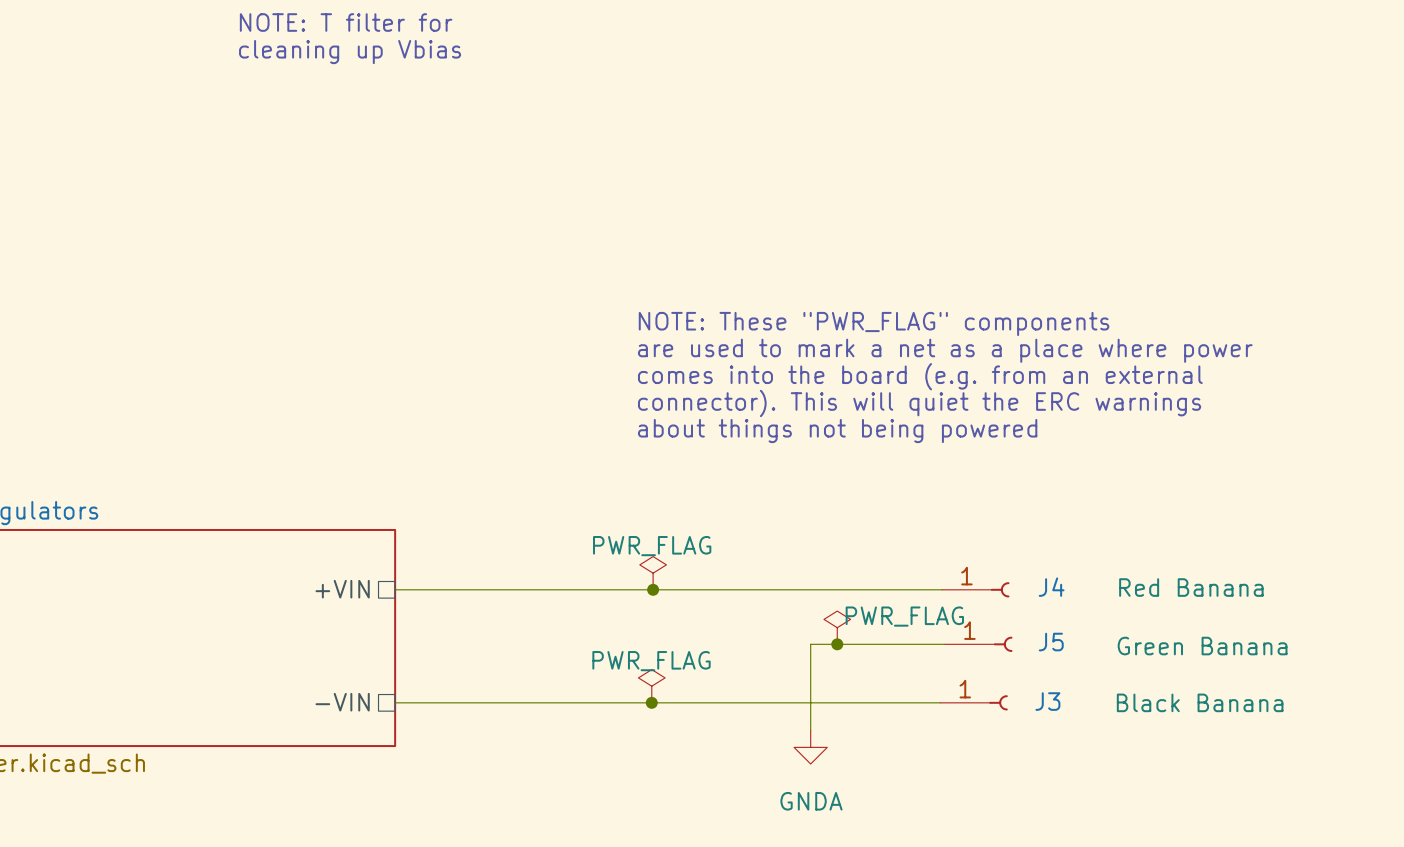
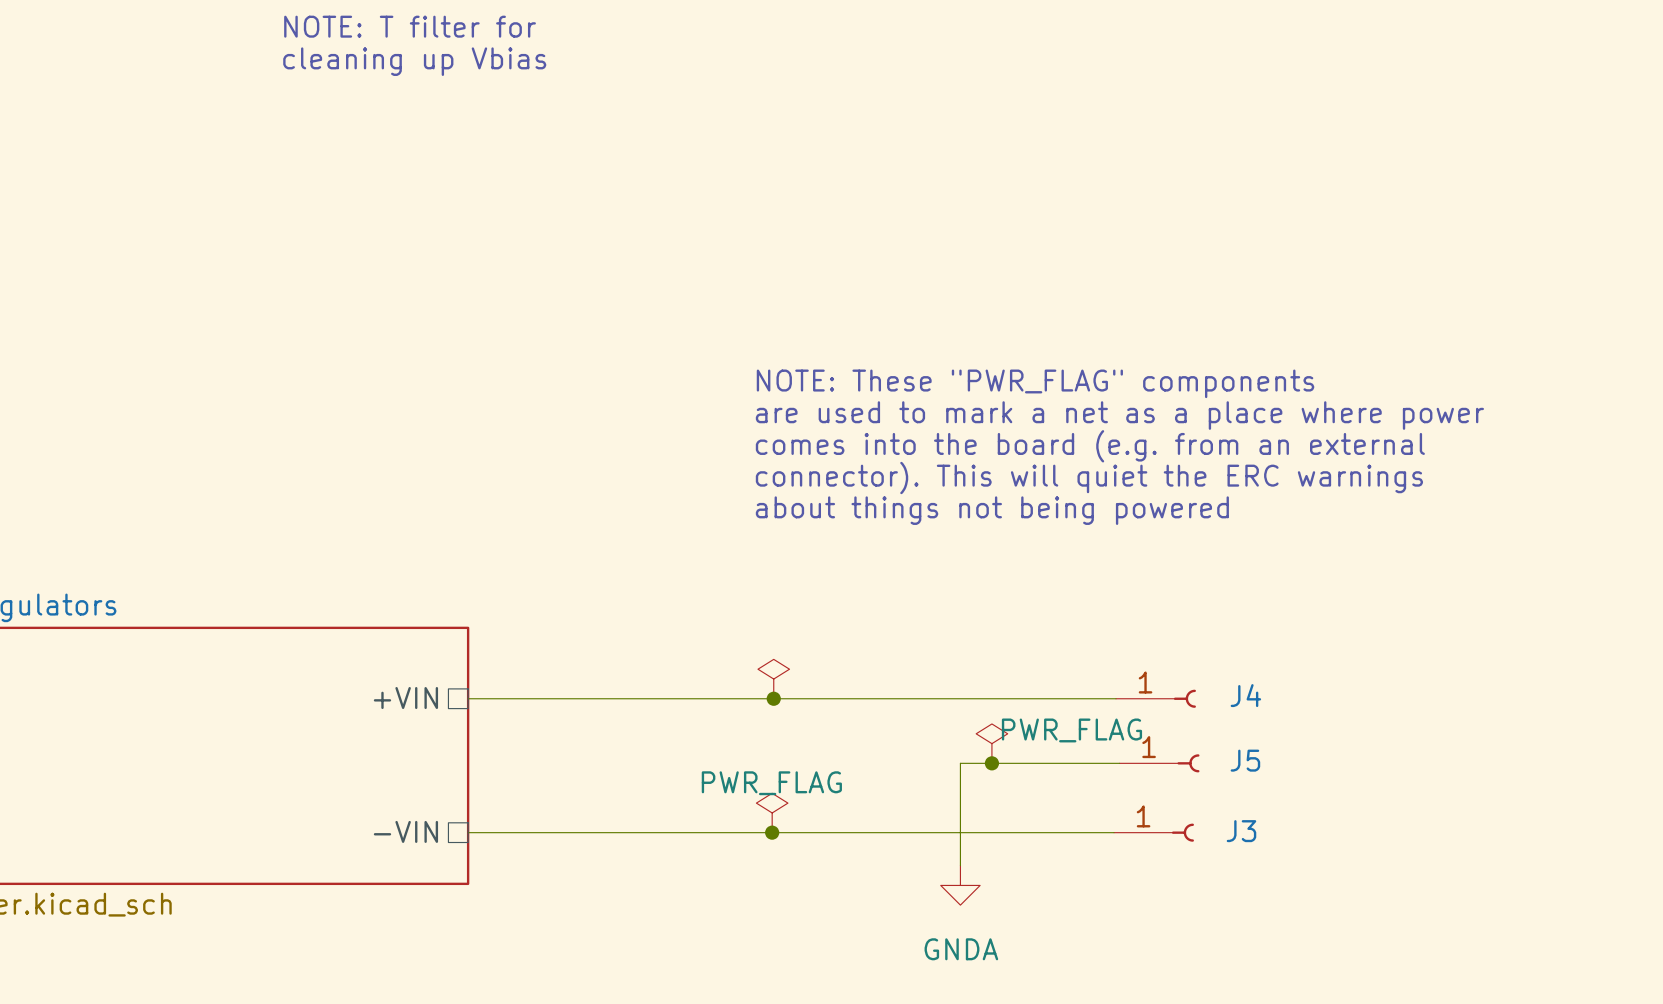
power symbol text: PWR_FLAG (652, 546) -> none
J4 value: Red Banana (1191, 587) -> none
J5 value: Green Banana (1202, 646) -> none
J3 value: Black Banana (1200, 702) -> none

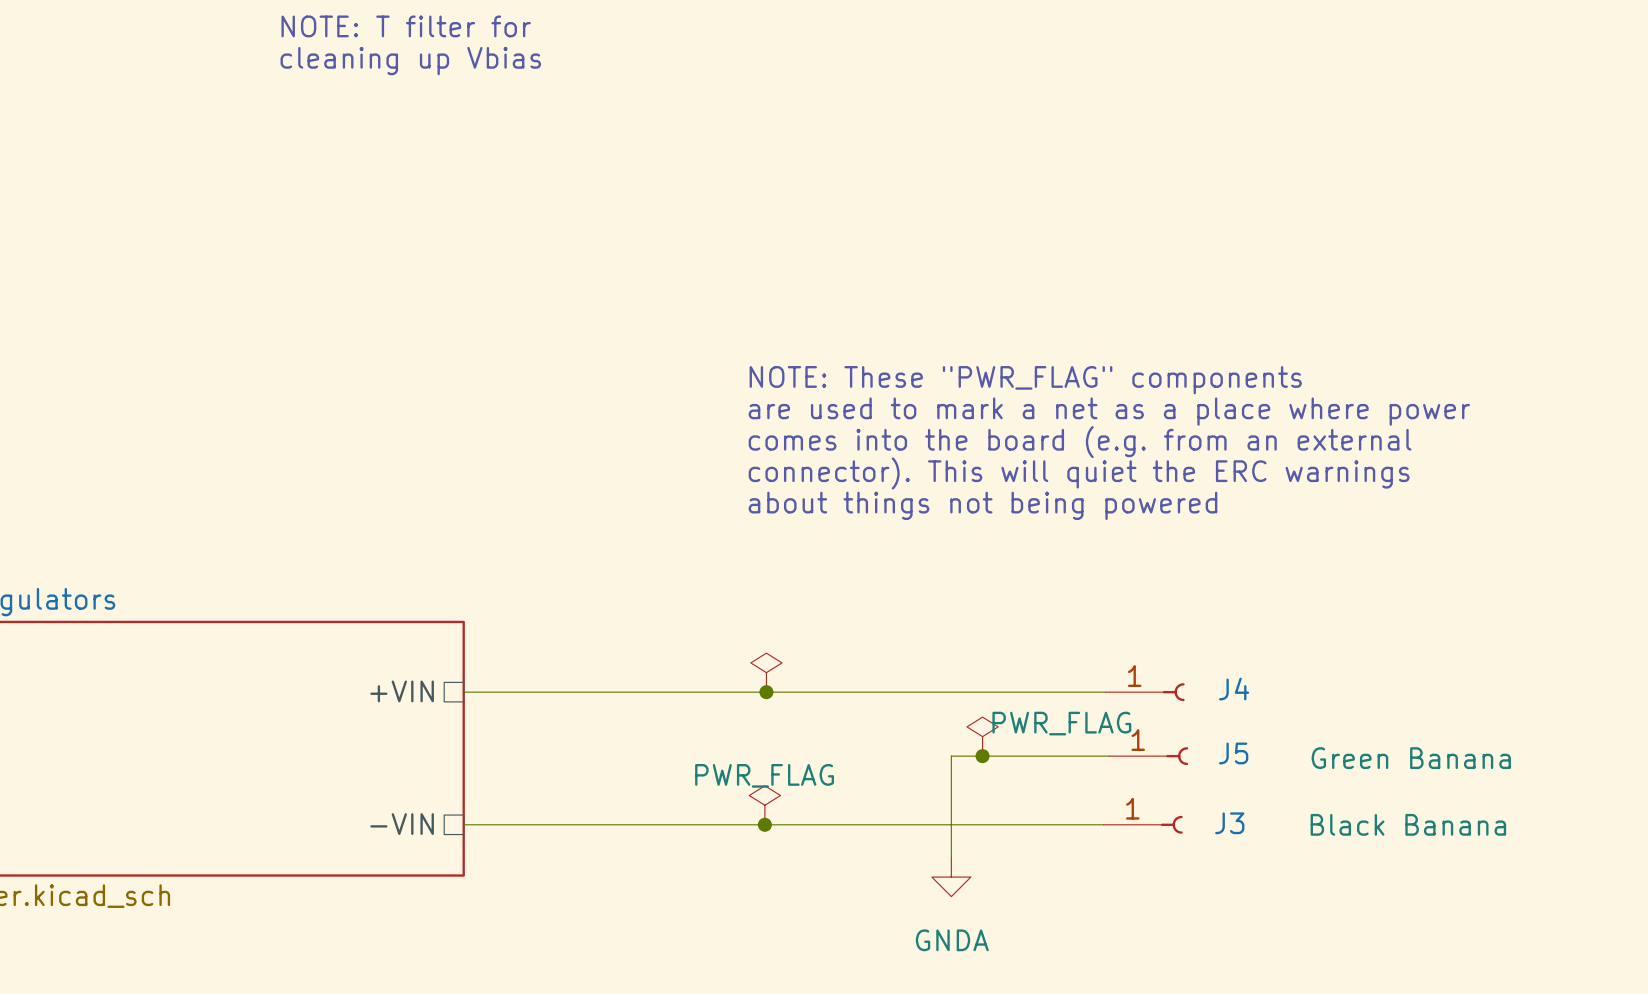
J5 value: none -> Green Banana (1411, 758)
J3 value: none -> Black Banana (1408, 824)

